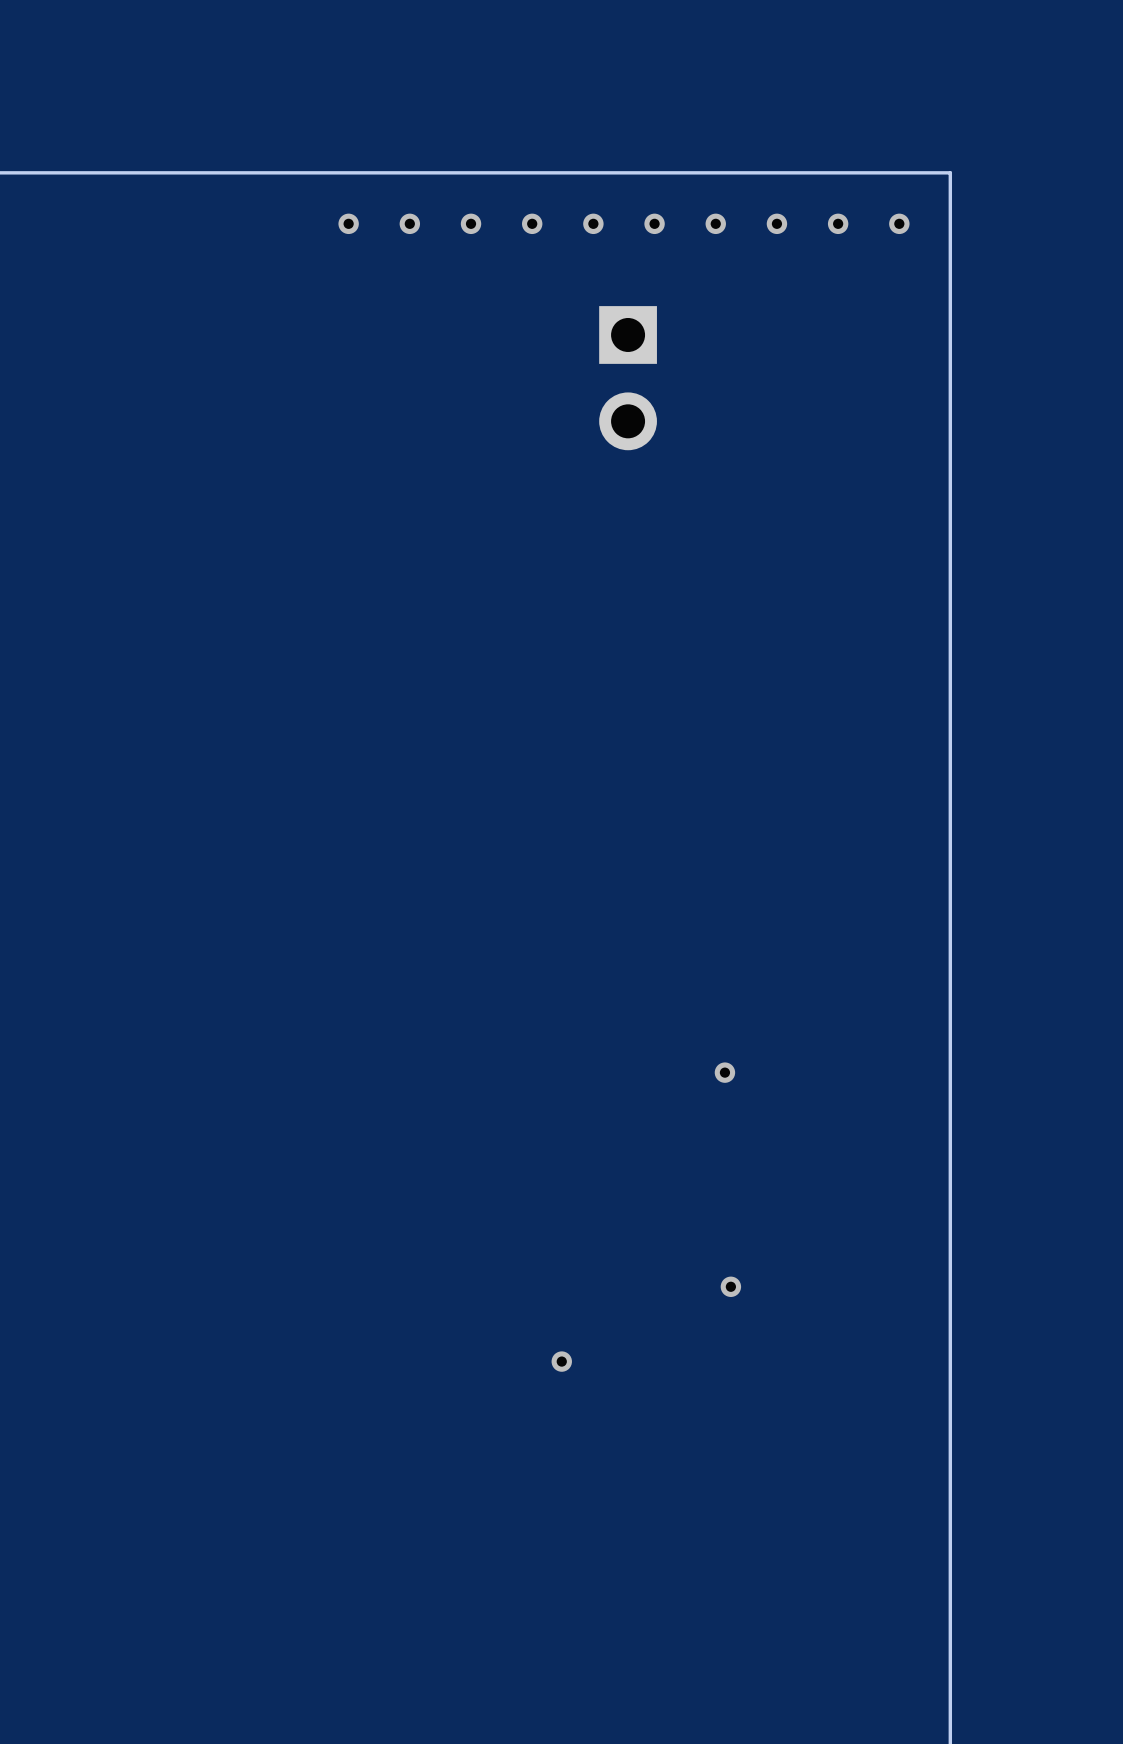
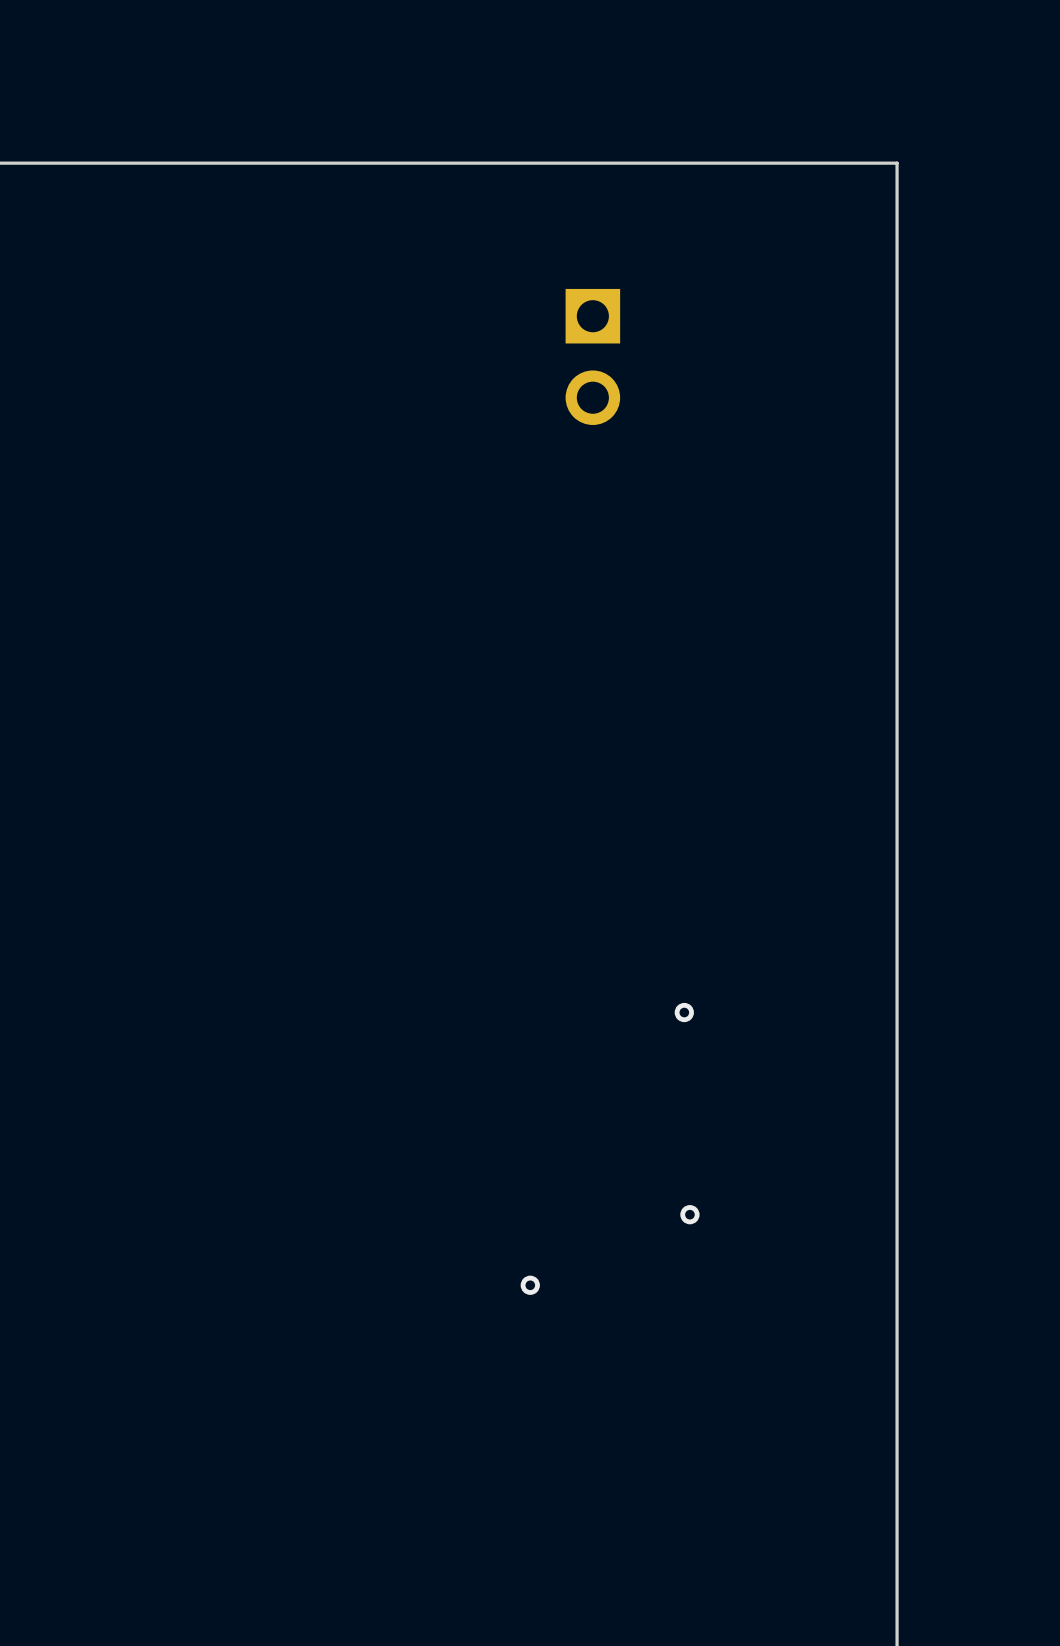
via: (348, 223) -> none
via: (409, 223) -> none
via: (471, 223) -> none
via: (532, 223) -> none
via: (593, 223) -> none
via: (654, 223) -> none
via: (715, 223) -> none
via: (776, 223) -> none
via: (838, 223) -> none
via: (899, 223) -> none

